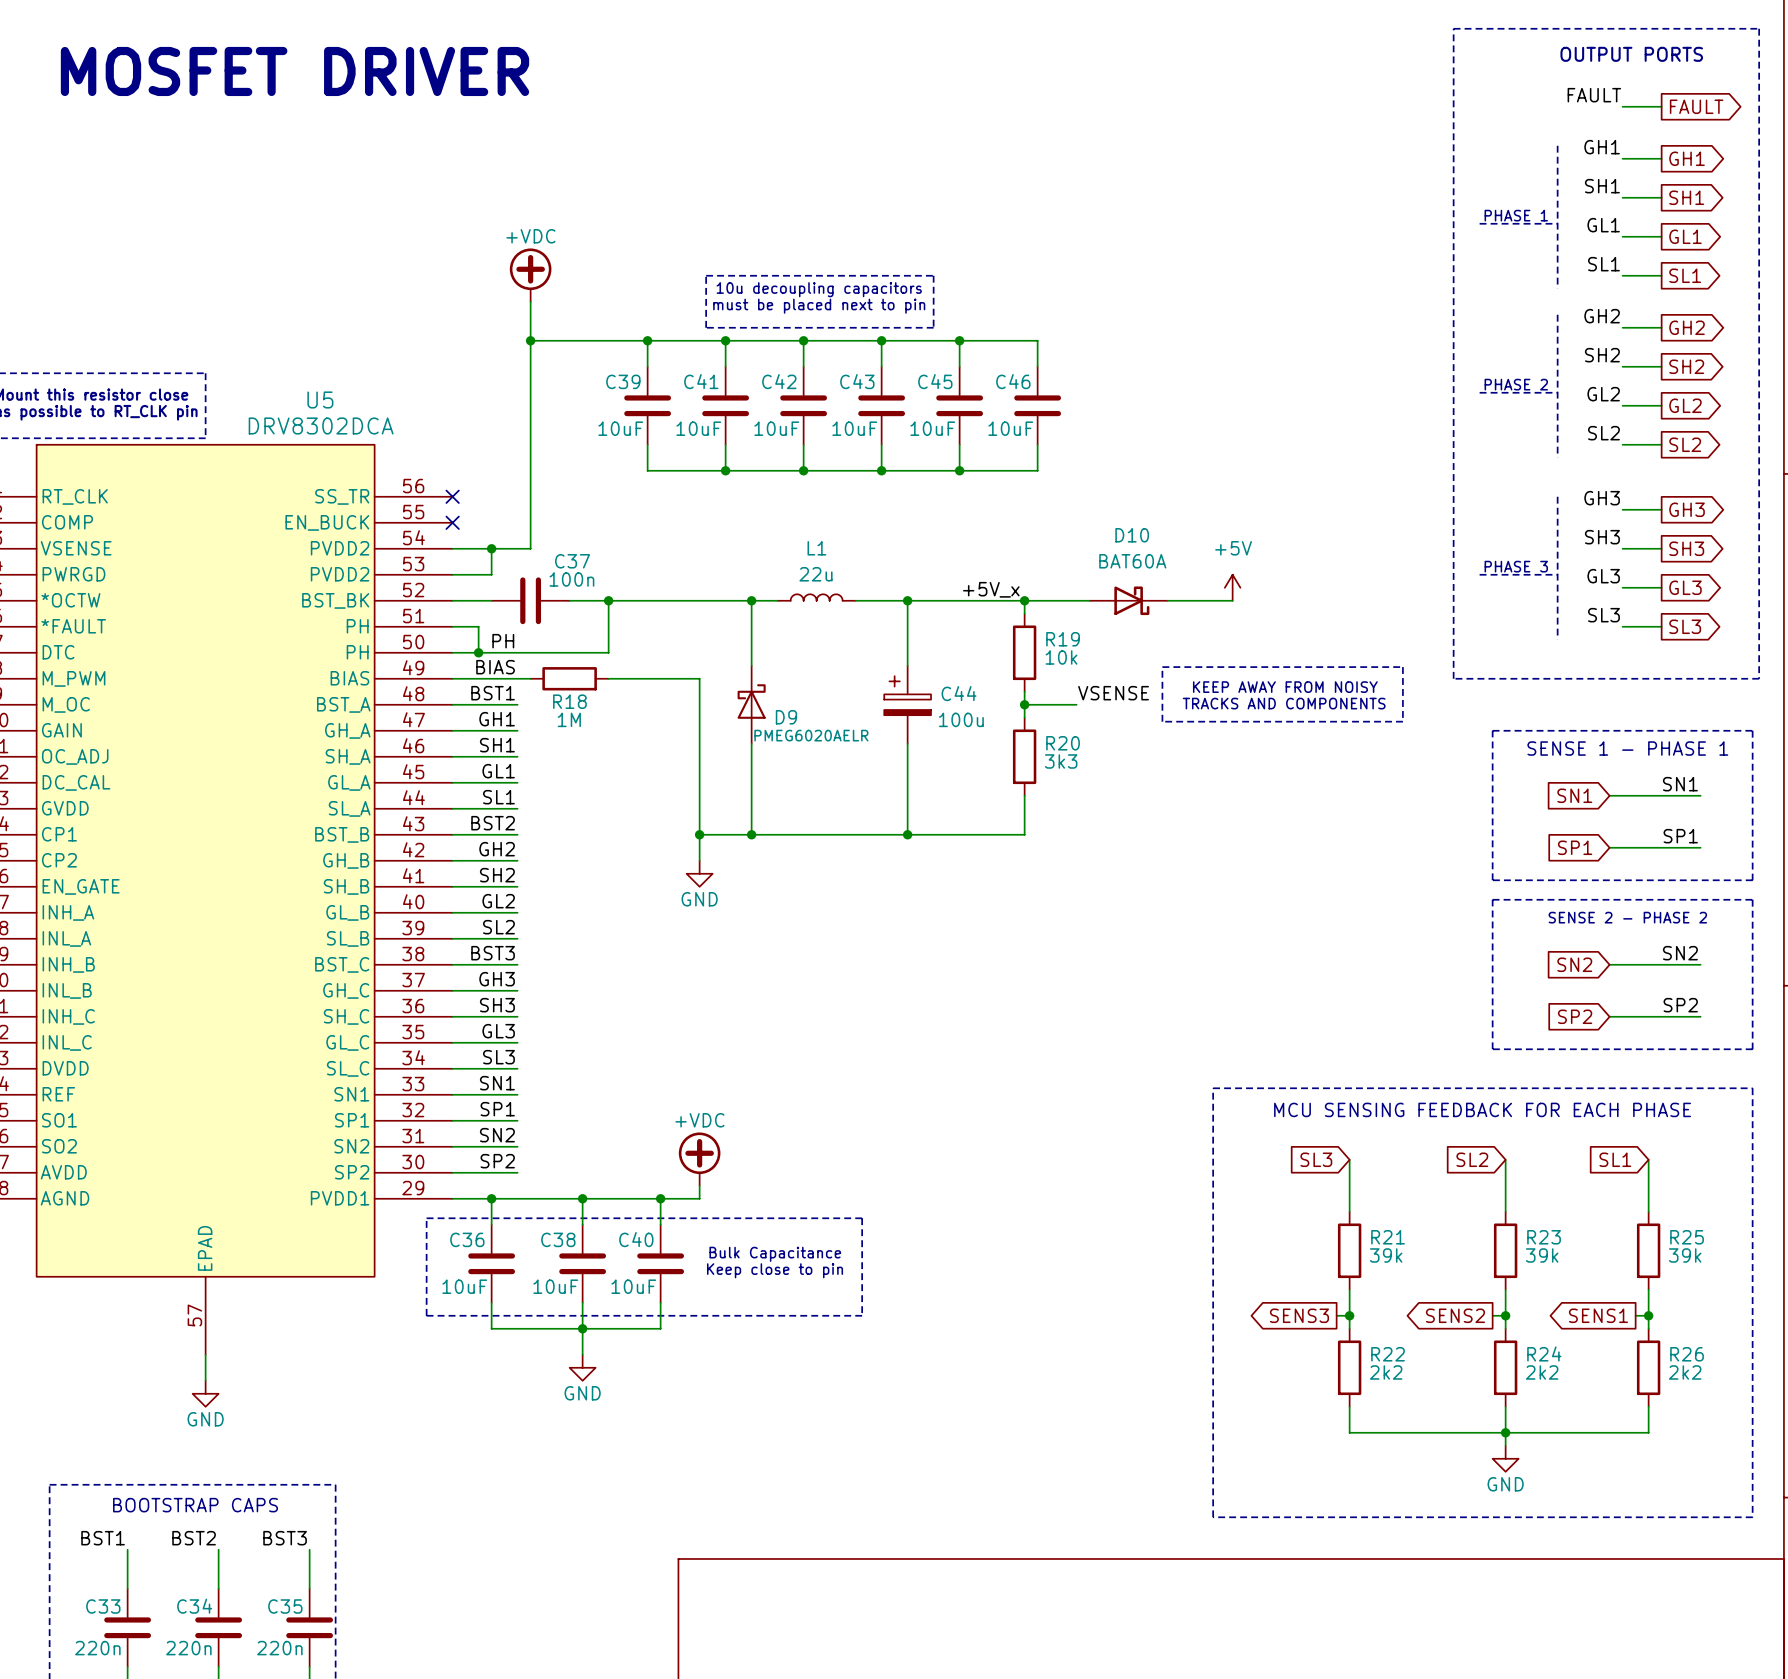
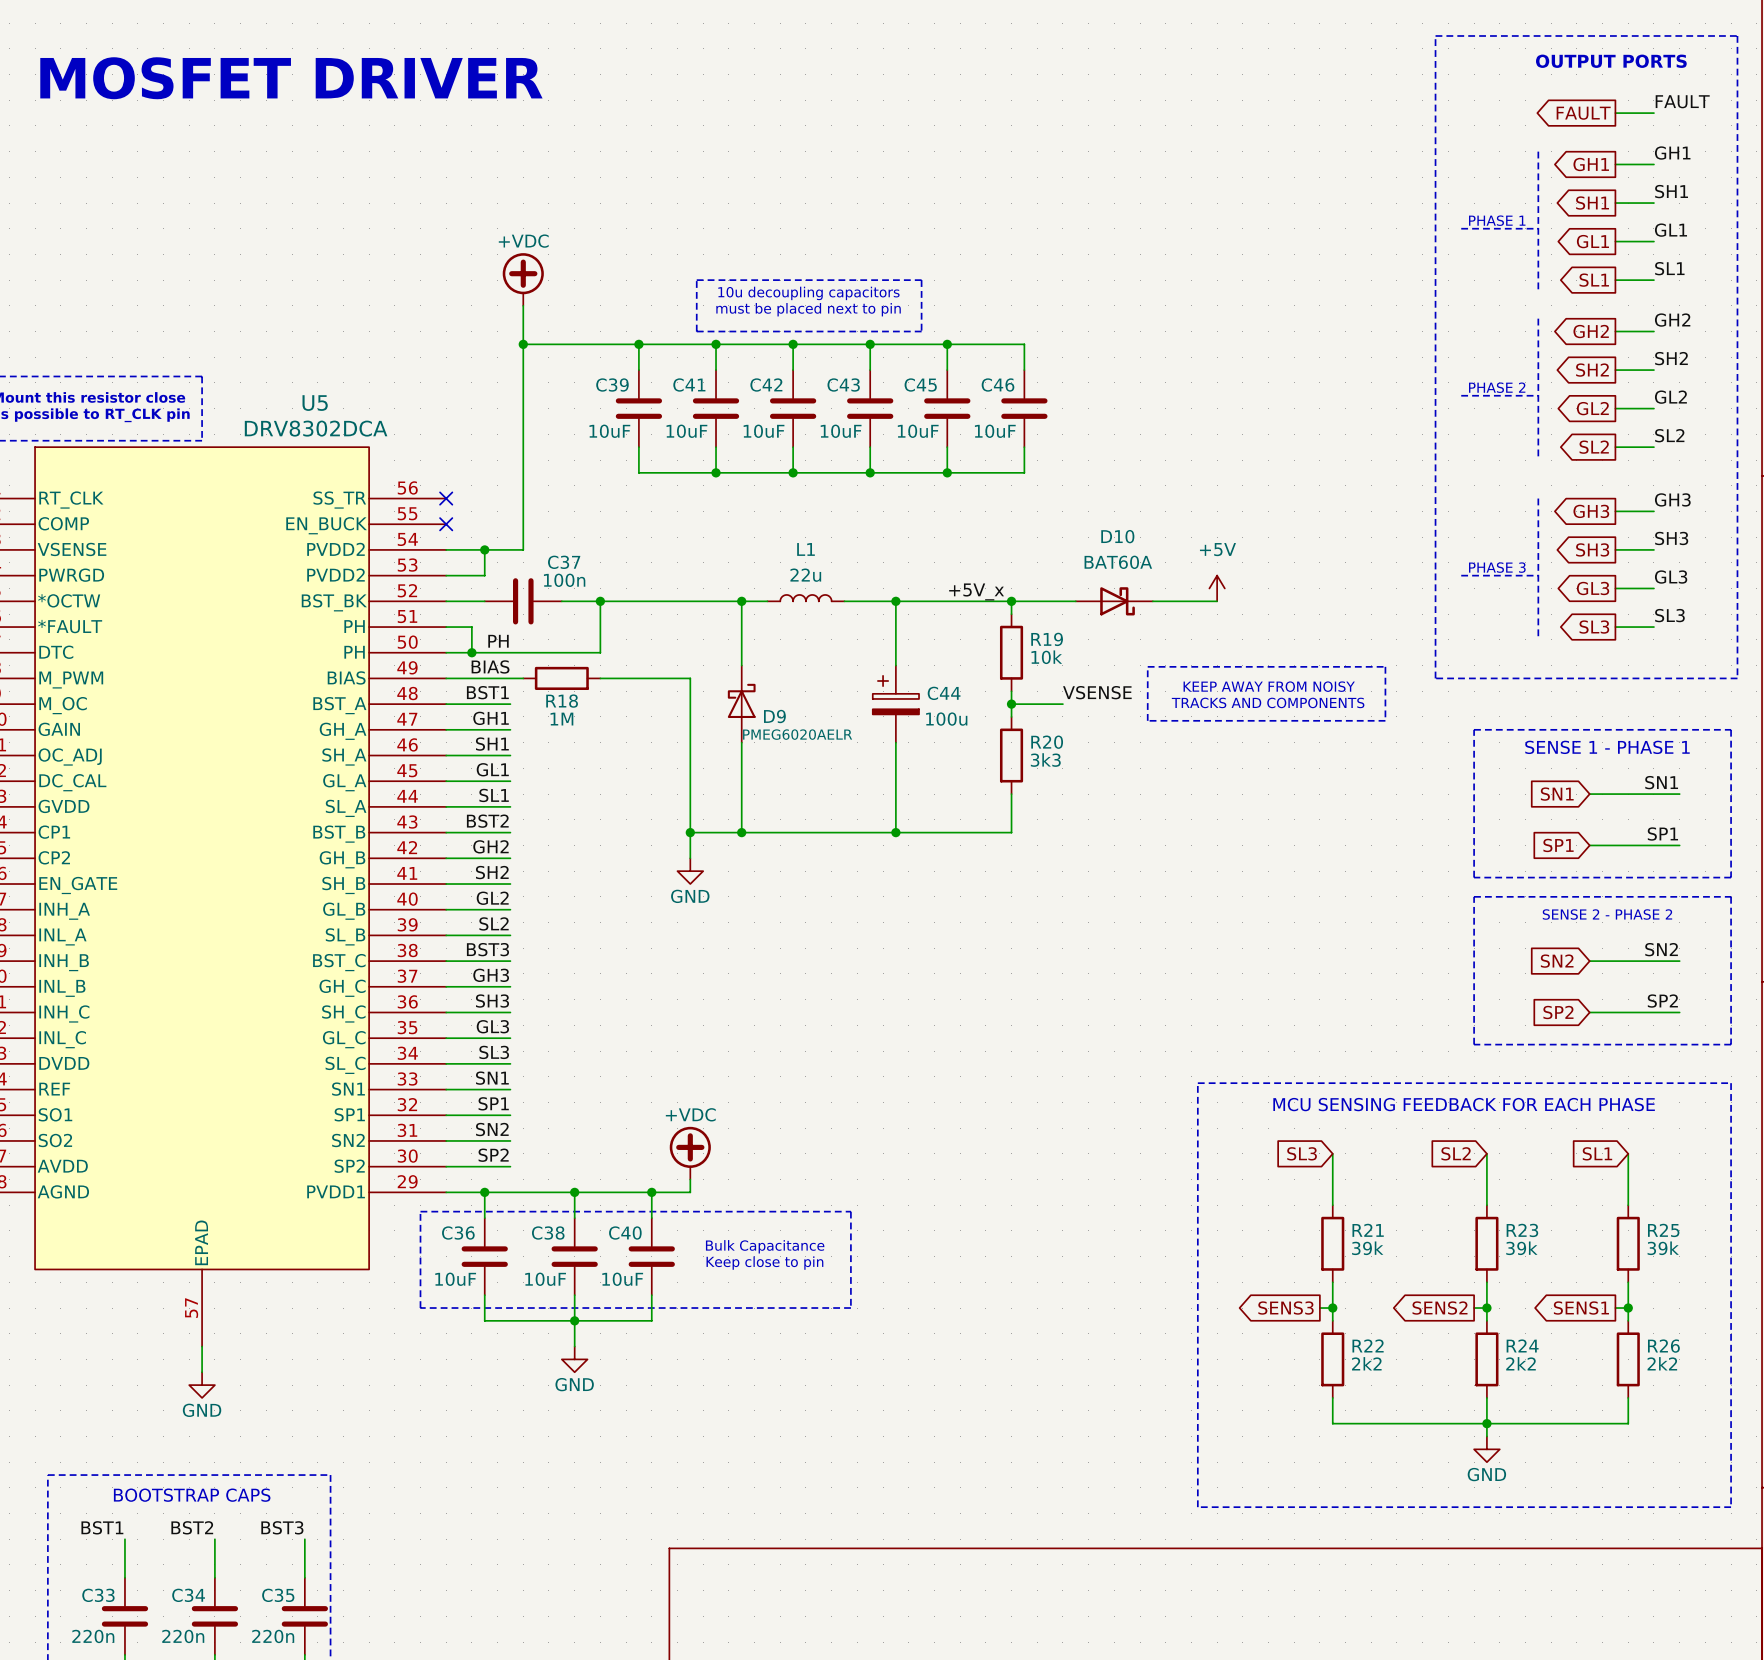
label position: FAULT (1594, 95) -> FAULT (1682, 101)
wire: (1622, 106) (1635, 106) -> (1641, 113) (1653, 113)
global label rotation: 0° (1696, 106) -> 180° (1583, 113)
global label position: FAULT (1696, 106) -> FAULT (1583, 113)
label position: GH1 (1602, 147) -> GH1 (1672, 153)
wire: (1622, 158) (1635, 158) -> (1641, 164) (1653, 164)
global label rotation: 0° (1687, 158) -> 180° (1591, 164)
global label position: GH1 (1687, 158) -> GH1 (1591, 164)
label position: SH1 (1602, 186) -> SH1 (1671, 191)
wire: (1622, 197) (1635, 197) -> (1641, 203) (1653, 203)
global label rotation: 0° (1686, 197) -> 180° (1592, 203)
global label position: SH1 (1686, 197) -> SH1 (1592, 203)
label position: GL1 (1603, 225) -> GL1 (1670, 230)
wire: (1622, 236) (1635, 236) -> (1641, 241) (1653, 241)
global label rotation: 0° (1685, 236) -> 180° (1592, 241)
global label position: GL1 (1685, 236) -> GL1 (1592, 241)
label position: SL1 (1603, 264) -> SL1 (1669, 268)
wire: (1622, 275) (1635, 275) -> (1641, 280) (1653, 280)
global label rotation: 0° (1685, 275) -> 180° (1594, 280)
global label position: SL1 (1685, 275) -> SL1 (1594, 280)
label position: GH2 (1602, 316) -> GH2 (1672, 320)
wire: (1622, 327) (1635, 327) -> (1641, 331) (1653, 331)
global label rotation: 0° (1687, 327) -> 180° (1591, 331)
global label position: GH2 (1687, 327) -> GH2 (1591, 331)
label position: SH2 (1602, 355) -> SH2 (1671, 358)
wire: (1622, 366) (1635, 366) -> (1641, 370) (1653, 370)
global label rotation: 0° (1686, 366) -> 180° (1592, 370)
global label position: SH2 (1686, 366) -> SH2 (1592, 370)
label position: GL2 (1603, 394) -> GL2 (1670, 397)
wire: (1622, 405) (1635, 405) -> (1641, 408) (1653, 408)
global label rotation: 0° (1685, 405) -> 180° (1592, 408)
global label position: GL2 (1685, 405) -> GL2 (1592, 408)
label position: SL2 (1603, 433) -> SL2 (1669, 435)
wire: (1622, 444) (1635, 444) -> (1641, 447) (1653, 447)
global label rotation: 0° (1685, 444) -> 180° (1594, 447)
global label position: SL2 (1685, 444) -> SL2 (1594, 447)
label position: GH3 (1602, 498) -> GH3 (1672, 499)
wire: (1622, 509) (1635, 509) -> (1641, 511) (1653, 511)
global label rotation: 0° (1687, 509) -> 180° (1591, 511)
global label position: GH3 (1687, 509) -> GH3 (1591, 511)
label position: SH3 (1602, 537) -> SH3 (1671, 538)
wire: (1622, 548) (1635, 548) -> (1641, 549) (1653, 549)
global label rotation: 0° (1686, 548) -> 180° (1592, 549)
global label position: SH3 (1686, 548) -> SH3 (1592, 549)
label position: GL3 (1603, 576) -> GL3 (1671, 577)
wire: (1622, 587) (1635, 587) -> (1641, 588) (1653, 588)
global label rotation: 0° (1685, 587) -> 180° (1593, 588)
global label position: GL3 (1685, 587) -> GL3 (1593, 588)
label position: SL3 (1603, 615) -> SL3 (1669, 615)
wire: (1622, 626) (1635, 626) -> (1641, 627) (1653, 627)
global label rotation: 0° (1685, 626) -> 180° (1594, 627)
global label position: SL3 (1685, 626) -> SL3 (1594, 627)

